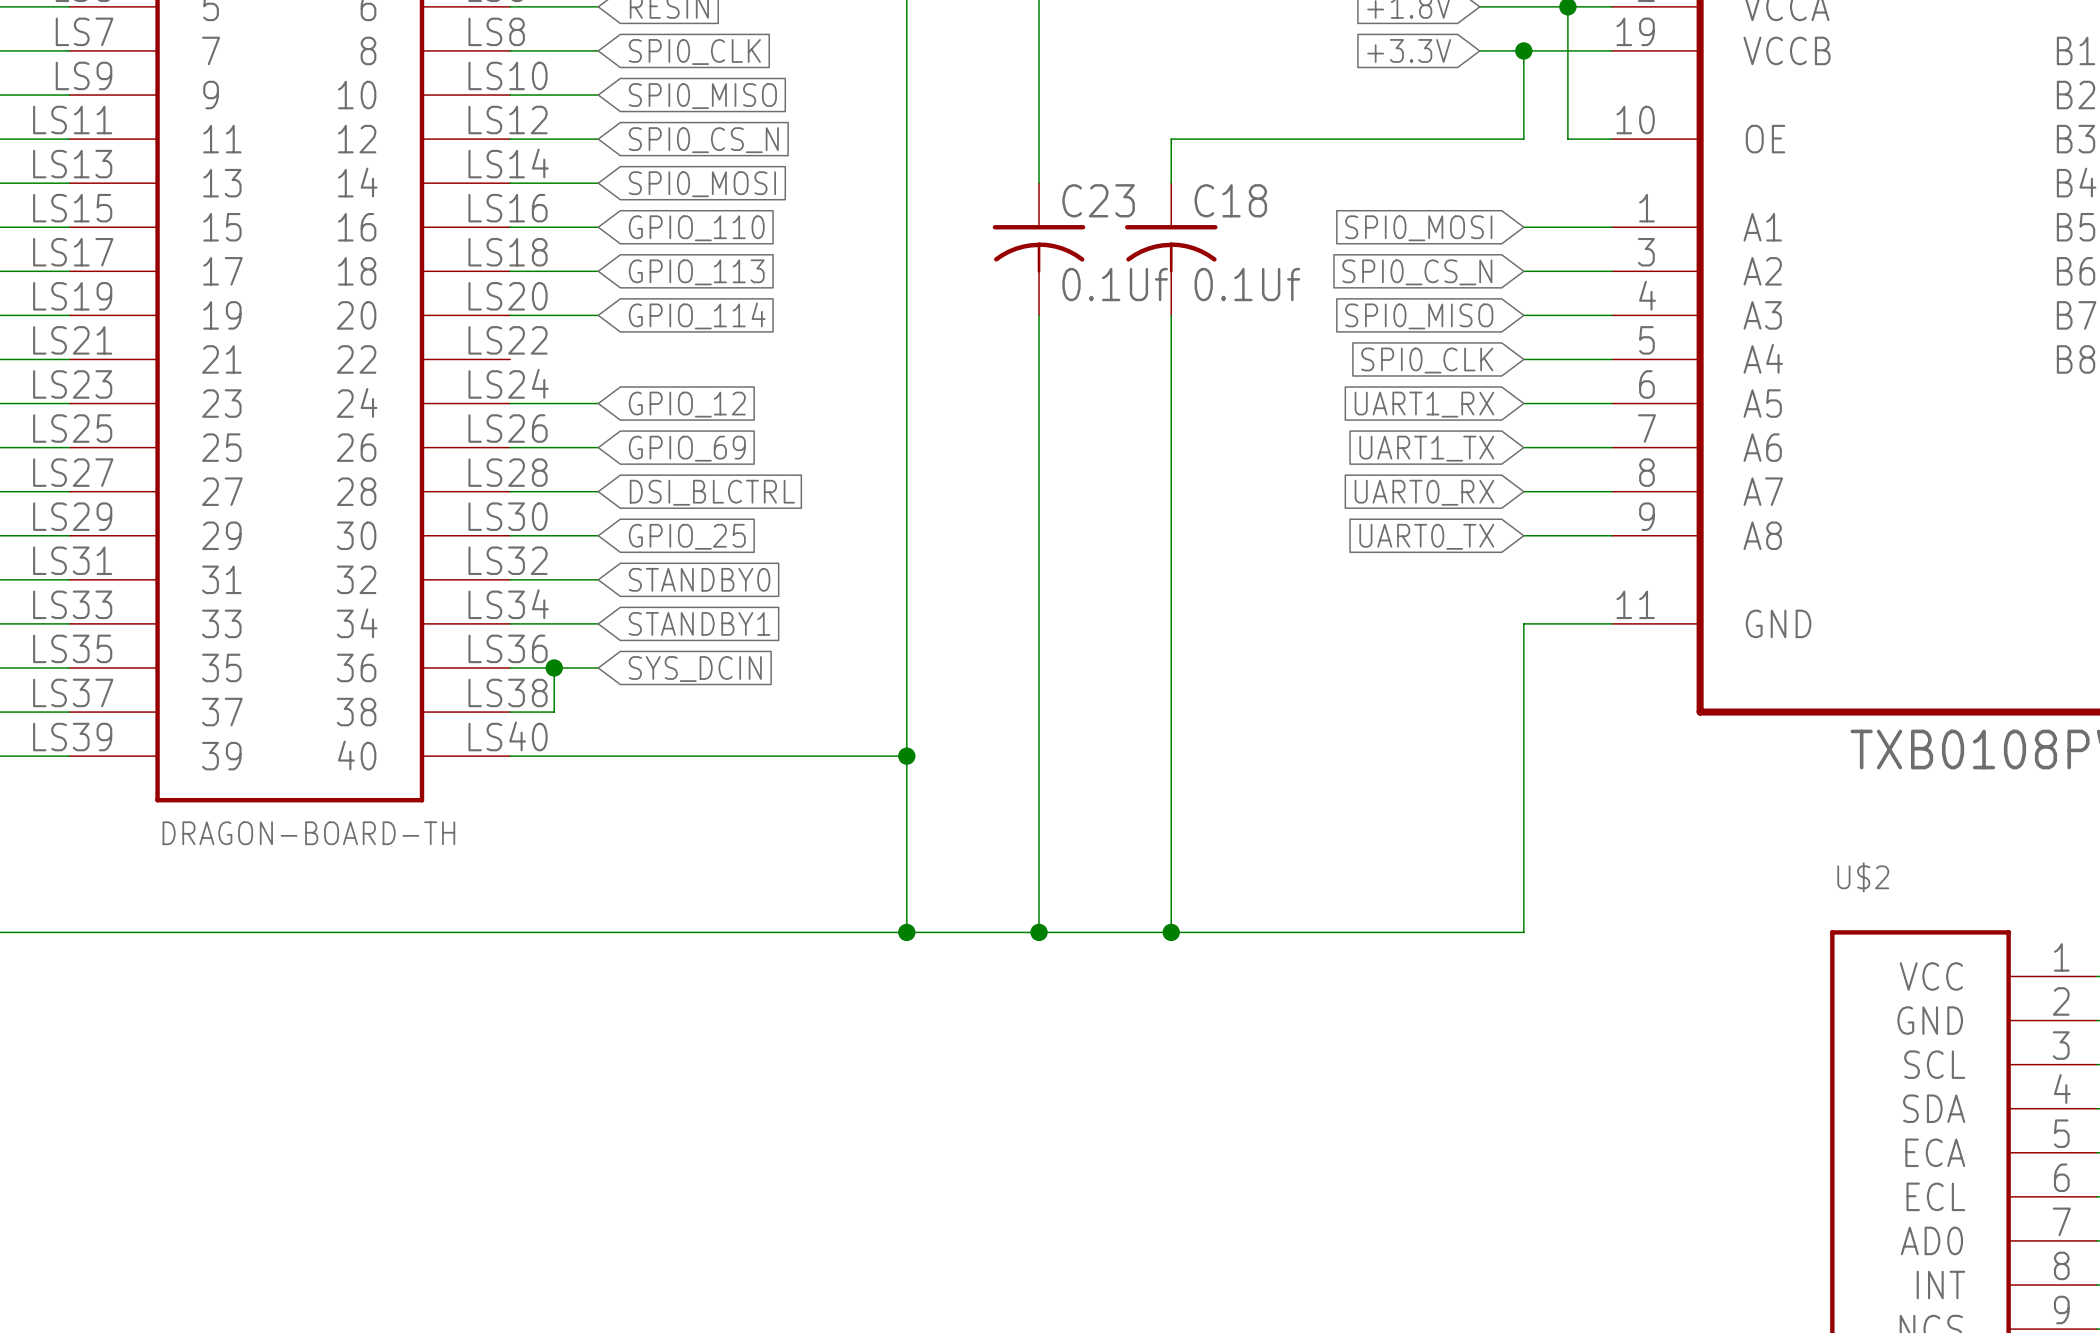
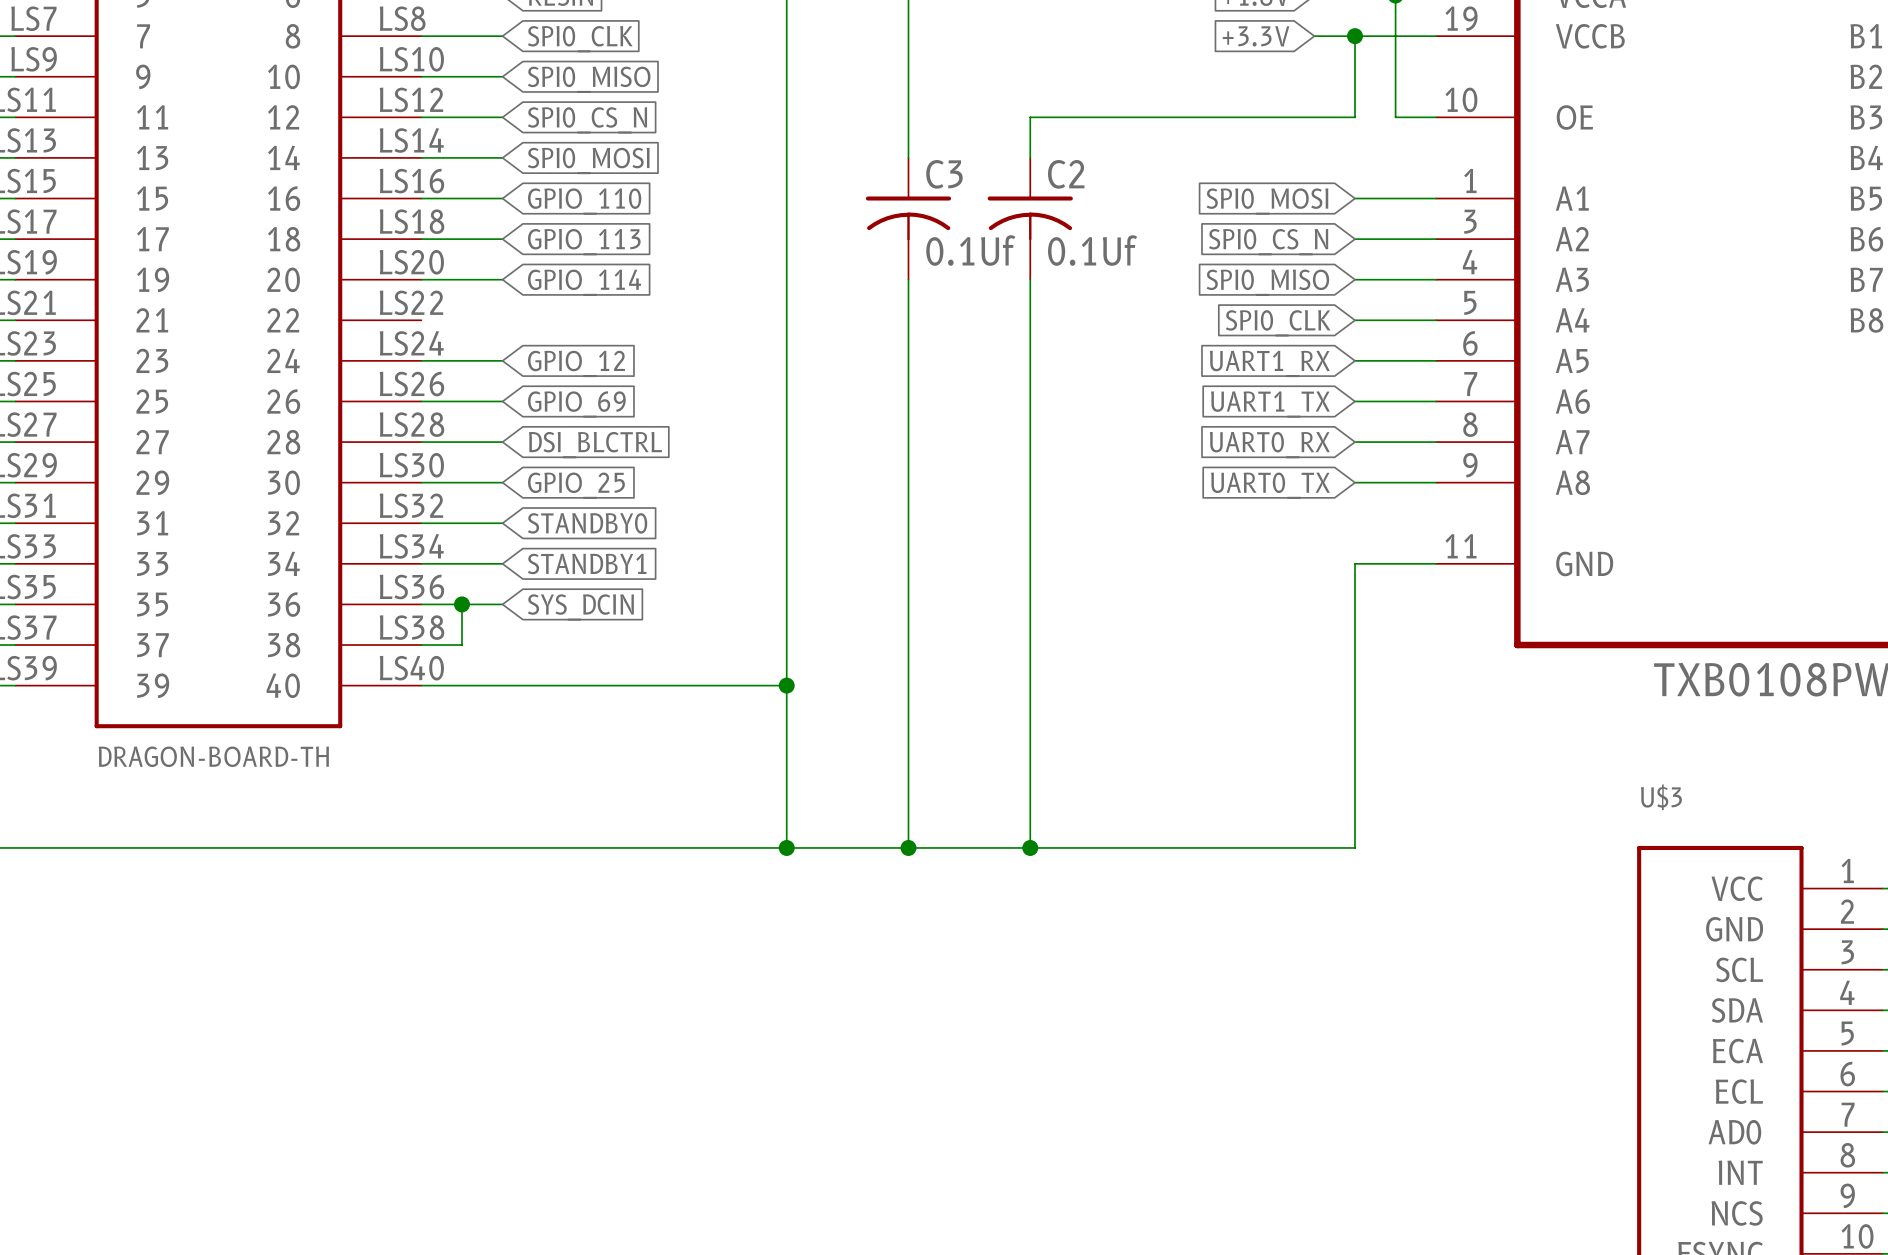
C23 name: C23 (1098, 200) -> C3 (944, 174)
C18 name: C18 (1230, 200) -> C2 (1066, 174)
U$2 name: U$2 (1863, 877) -> U$3 (1661, 797)

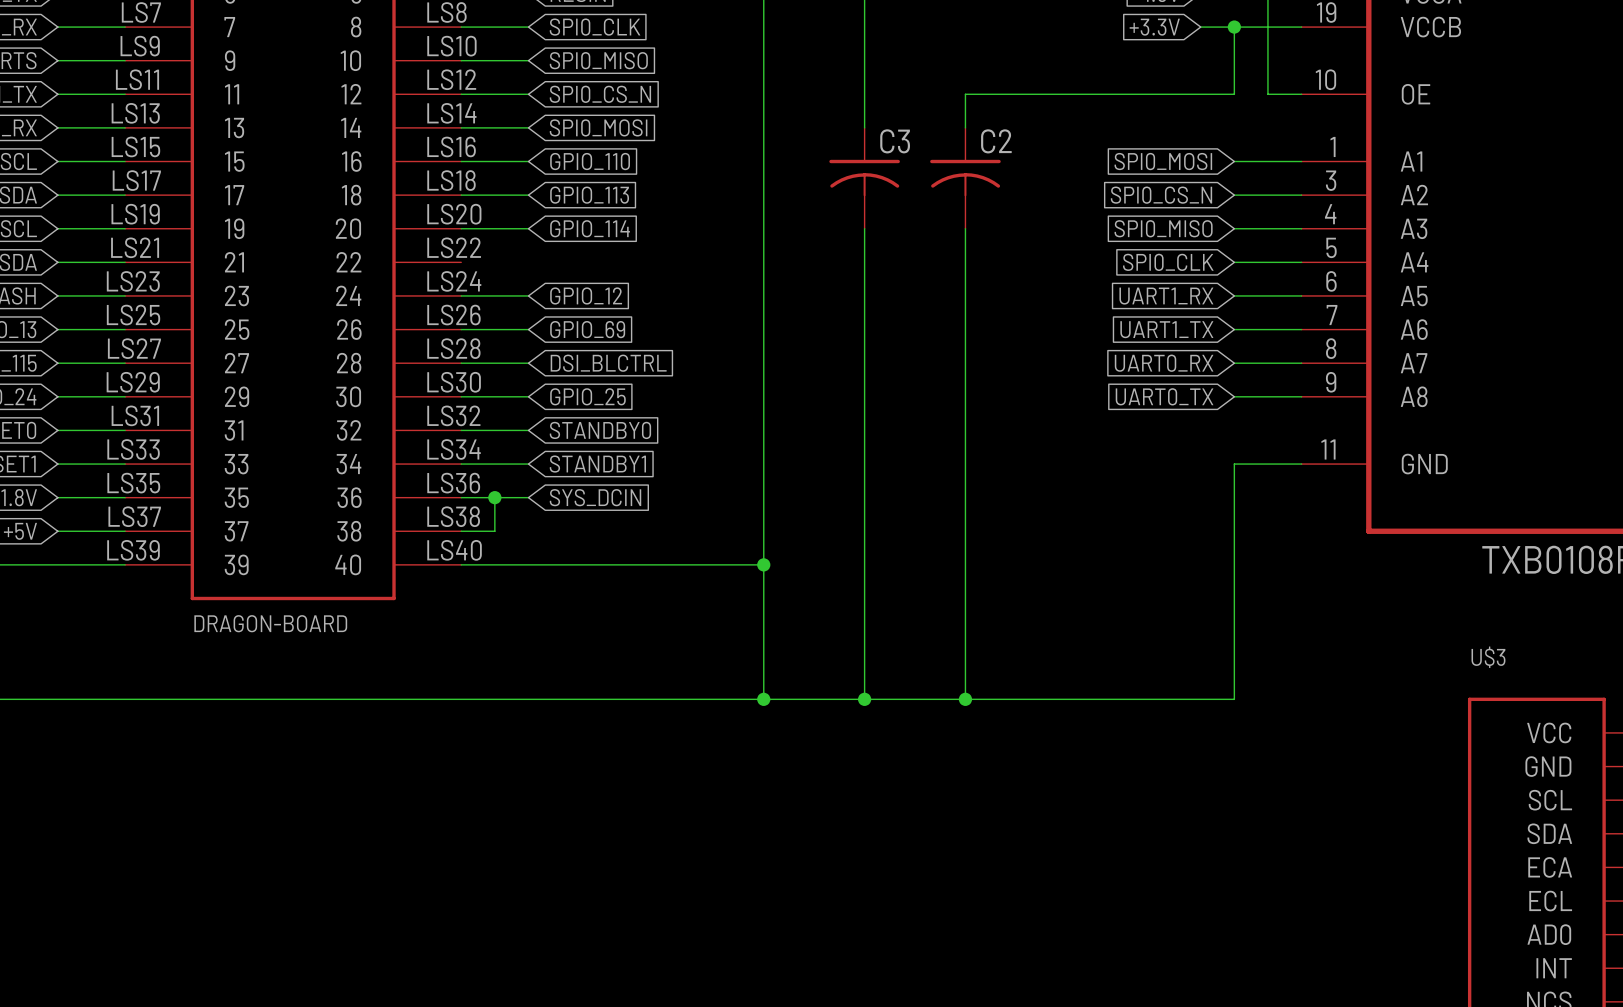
C3 value: 0.1Uf (970, 250) -> none
C2 value: 0.1Uf (1092, 250) -> none
part value: DRAGON-BOARD-TH (213, 756) -> DRAGON-BOARD (270, 623)

